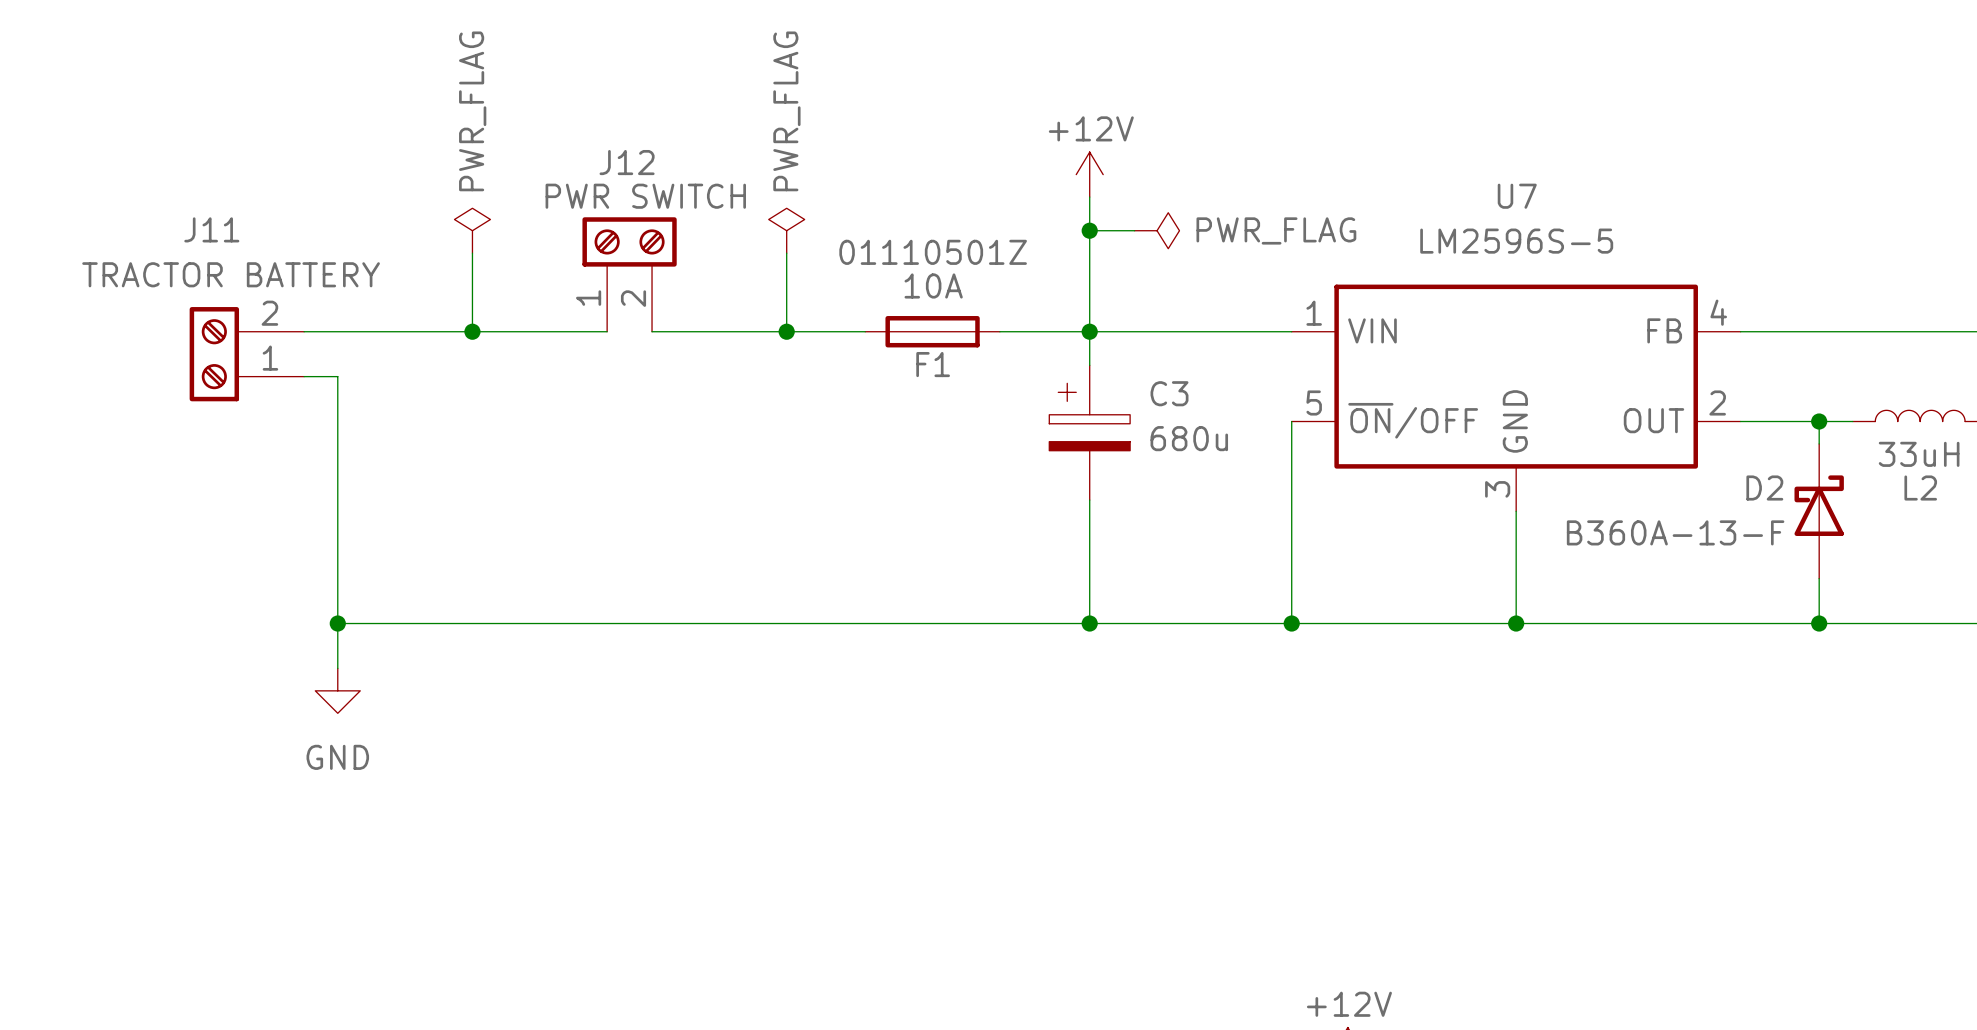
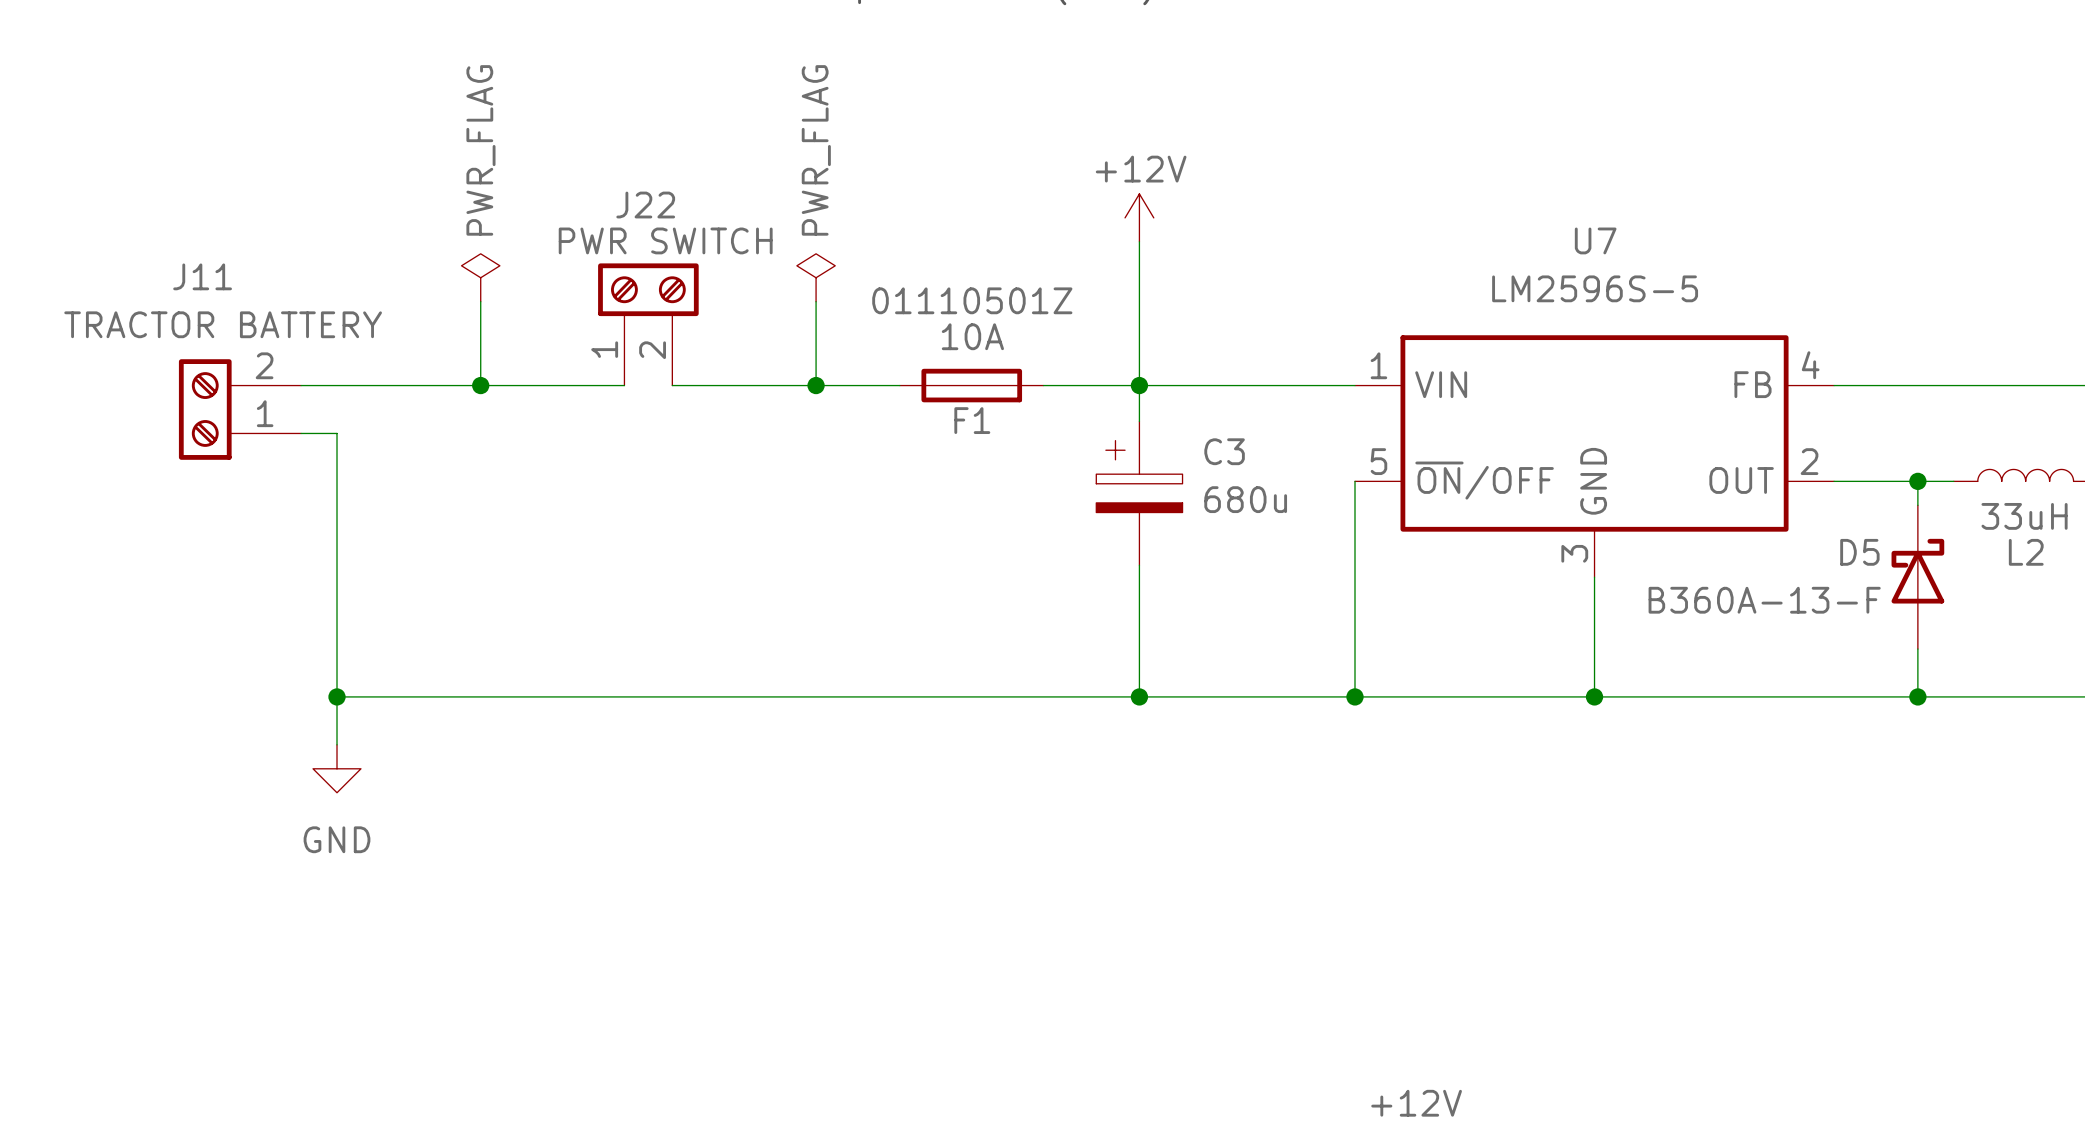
J12 name: J12 (627, 162) -> J22 (645, 205)
wire: (1089, 230) (1134, 230) -> none
junction: (1089, 230) -> none
power symbol: PWR_FLAG (1157, 230) -> none
D2 name: D2 (1764, 488) -> D5 (1859, 552)

